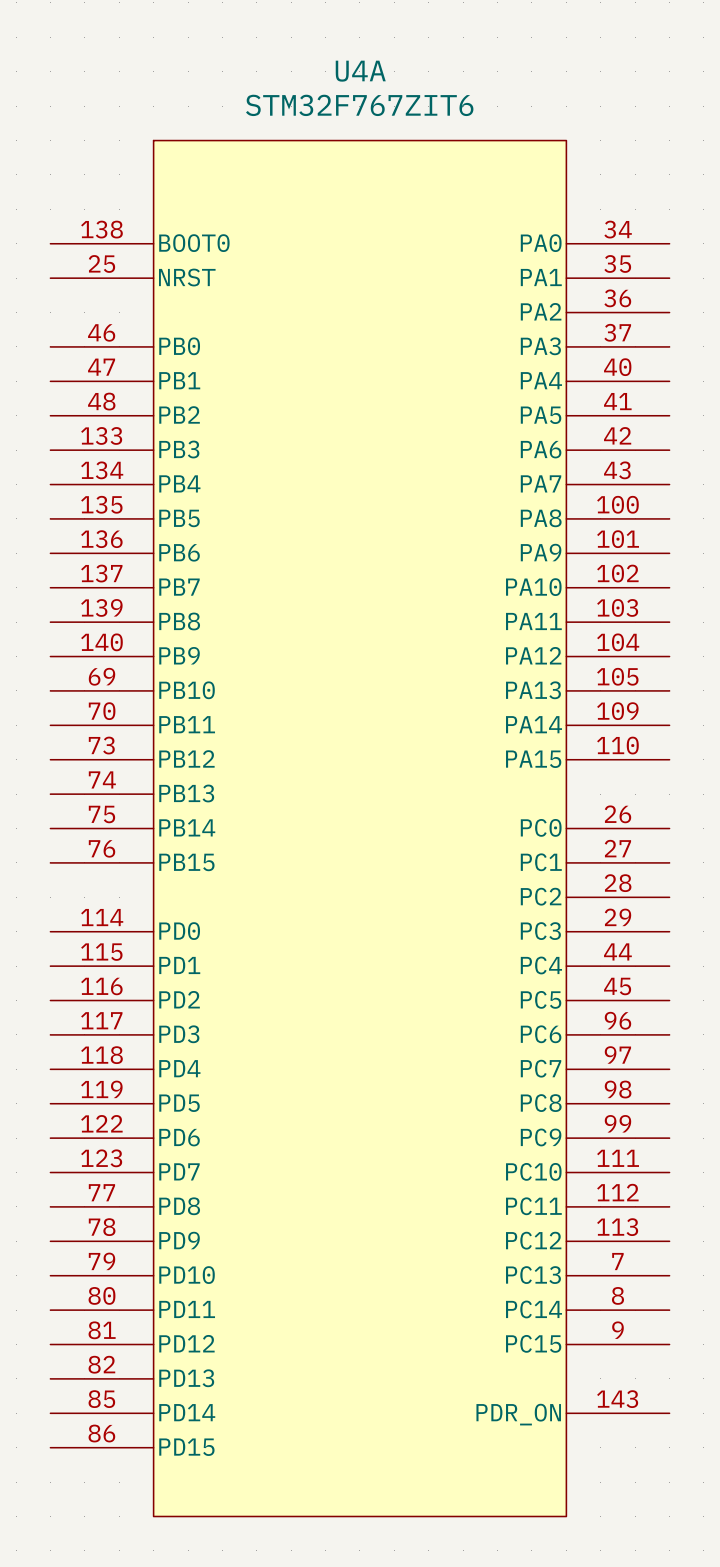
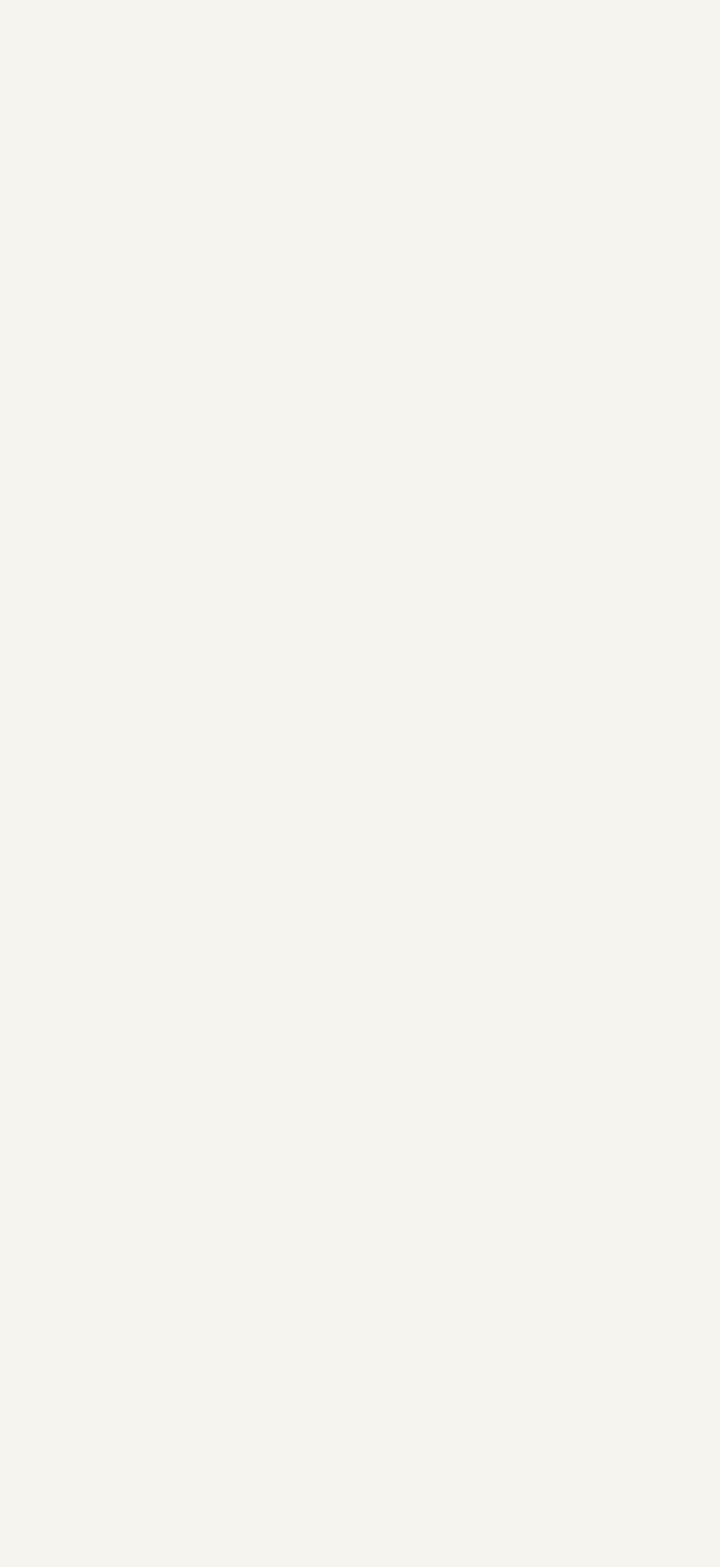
U4A: STM32F767ZIT6 (359, 828) -> none

